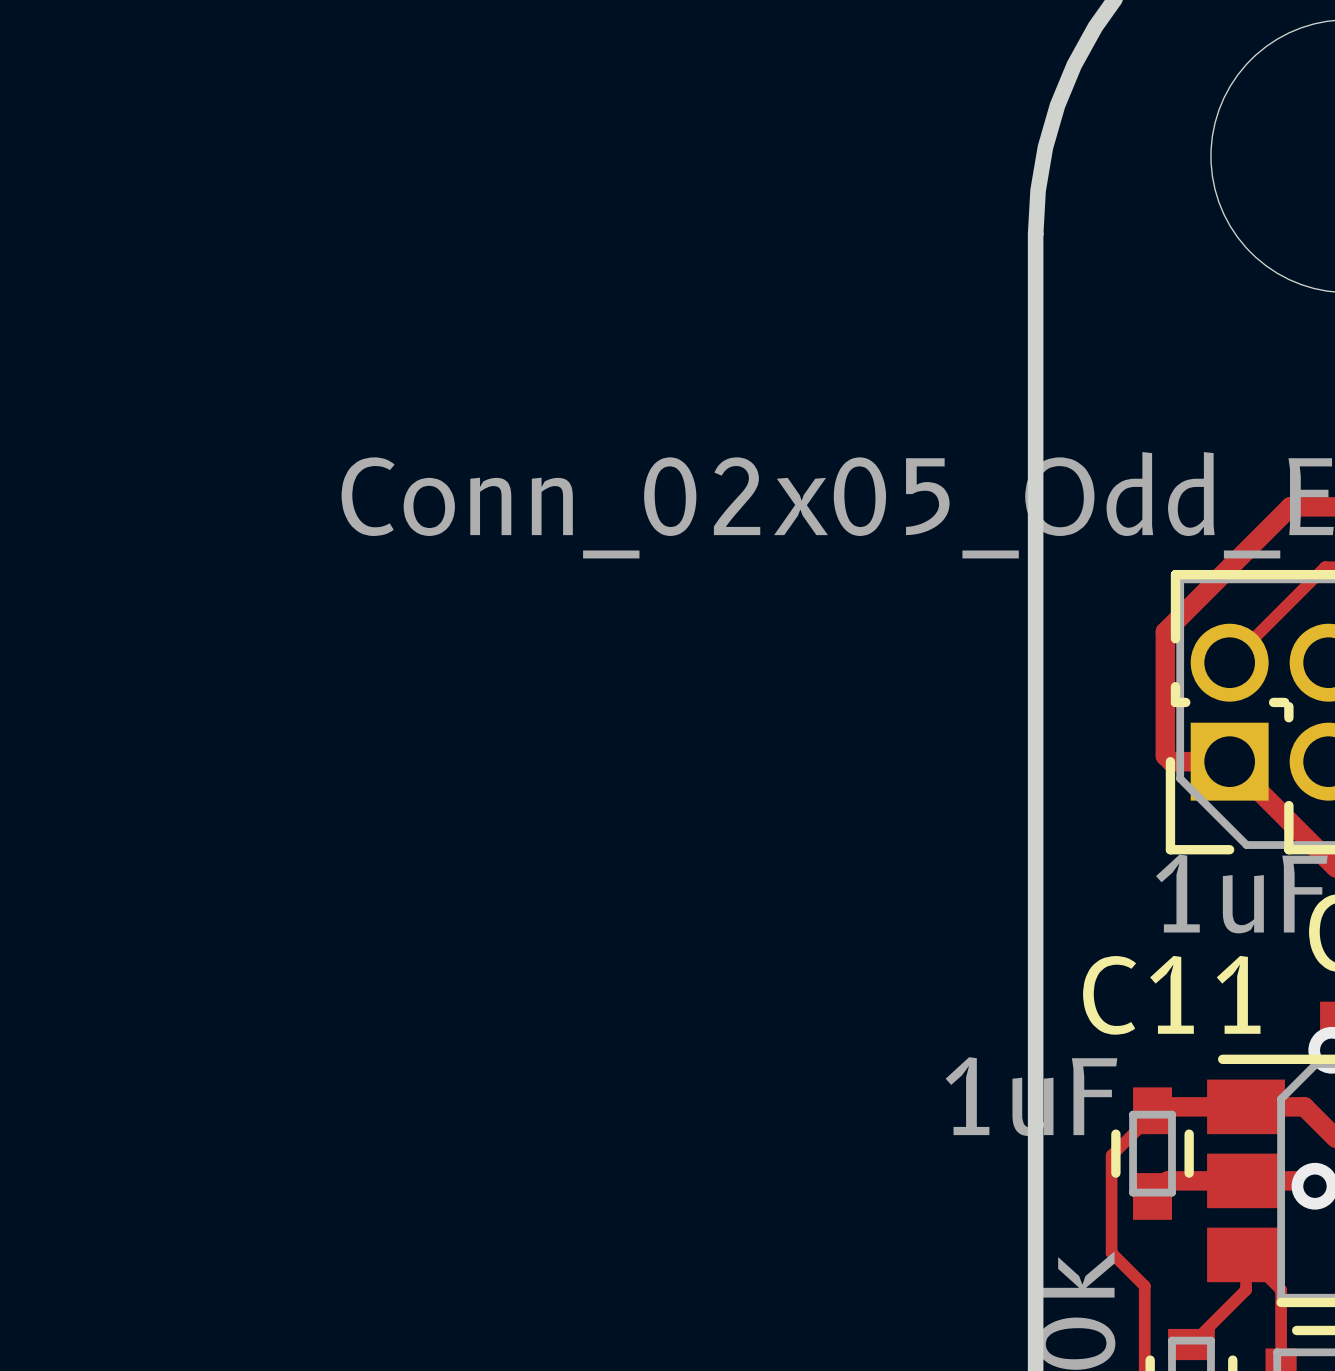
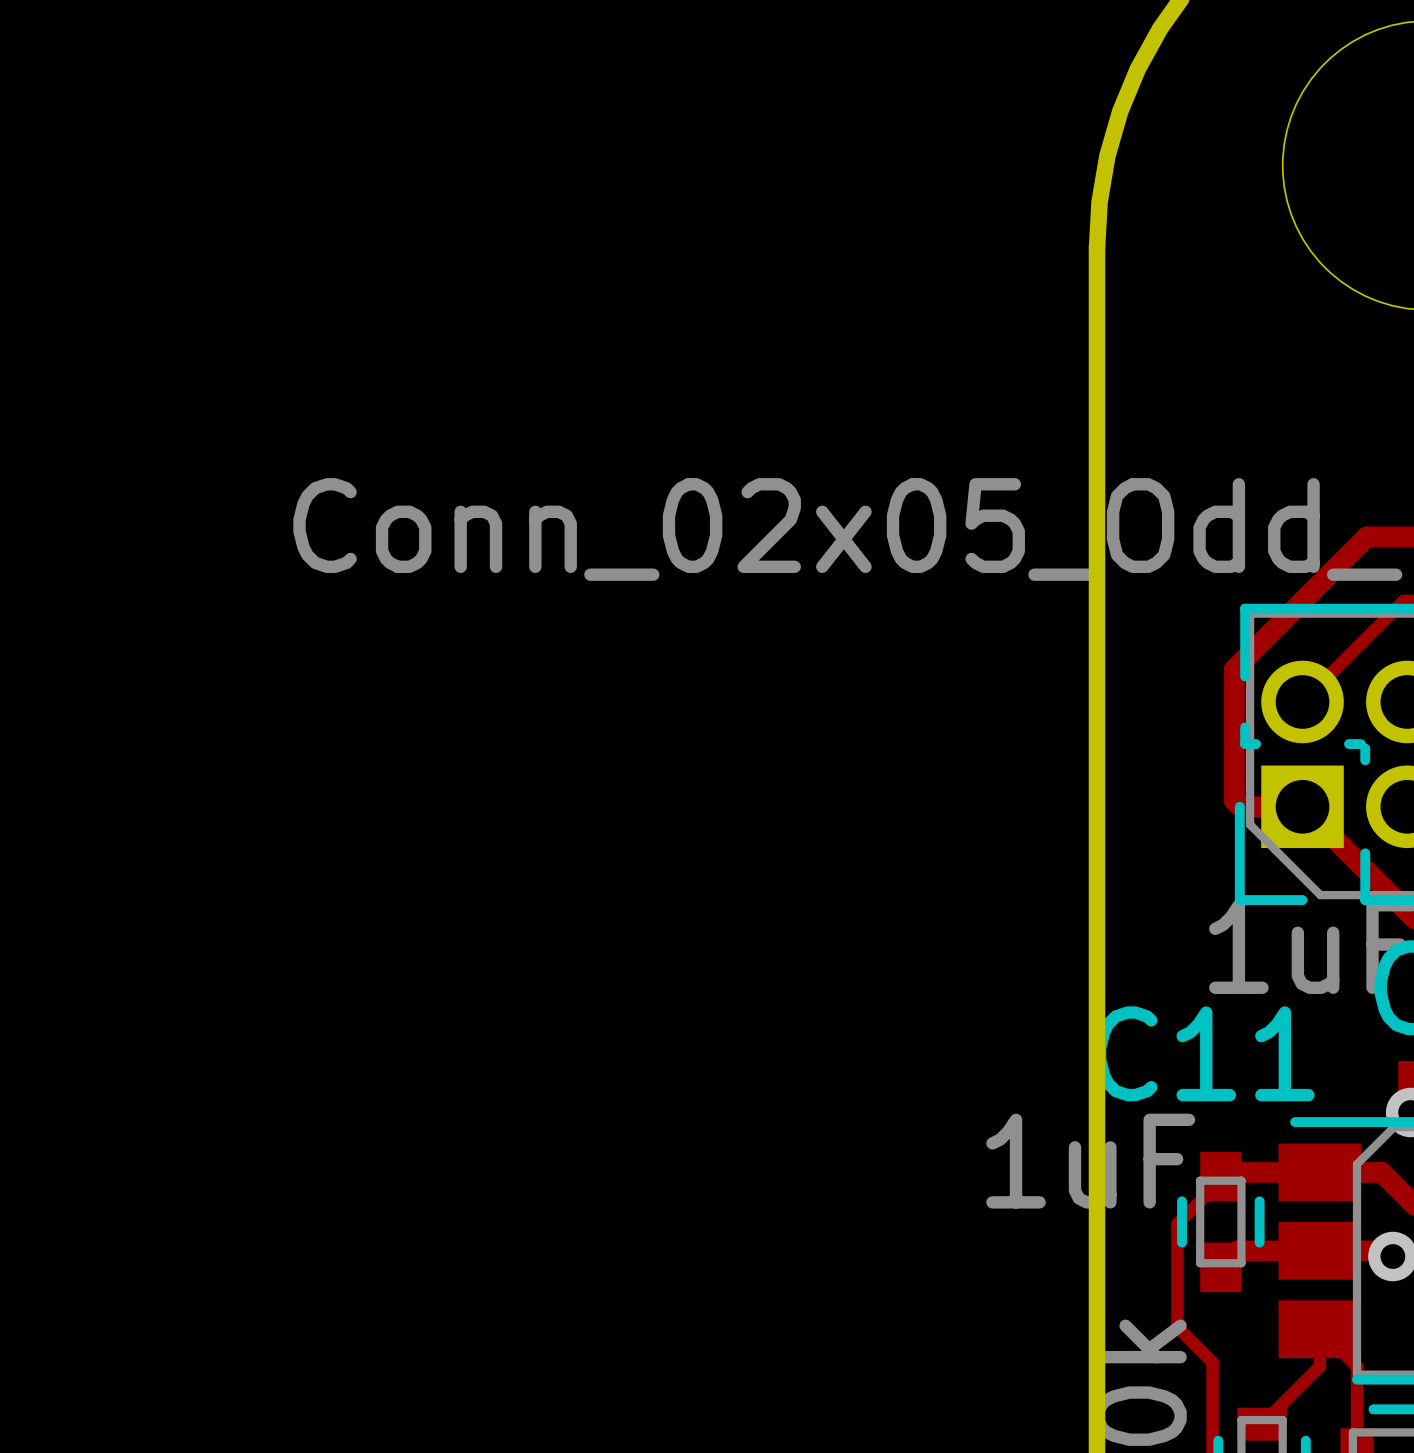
C11 name position: C11 (1171, 995) -> C11 (1204, 1053)

